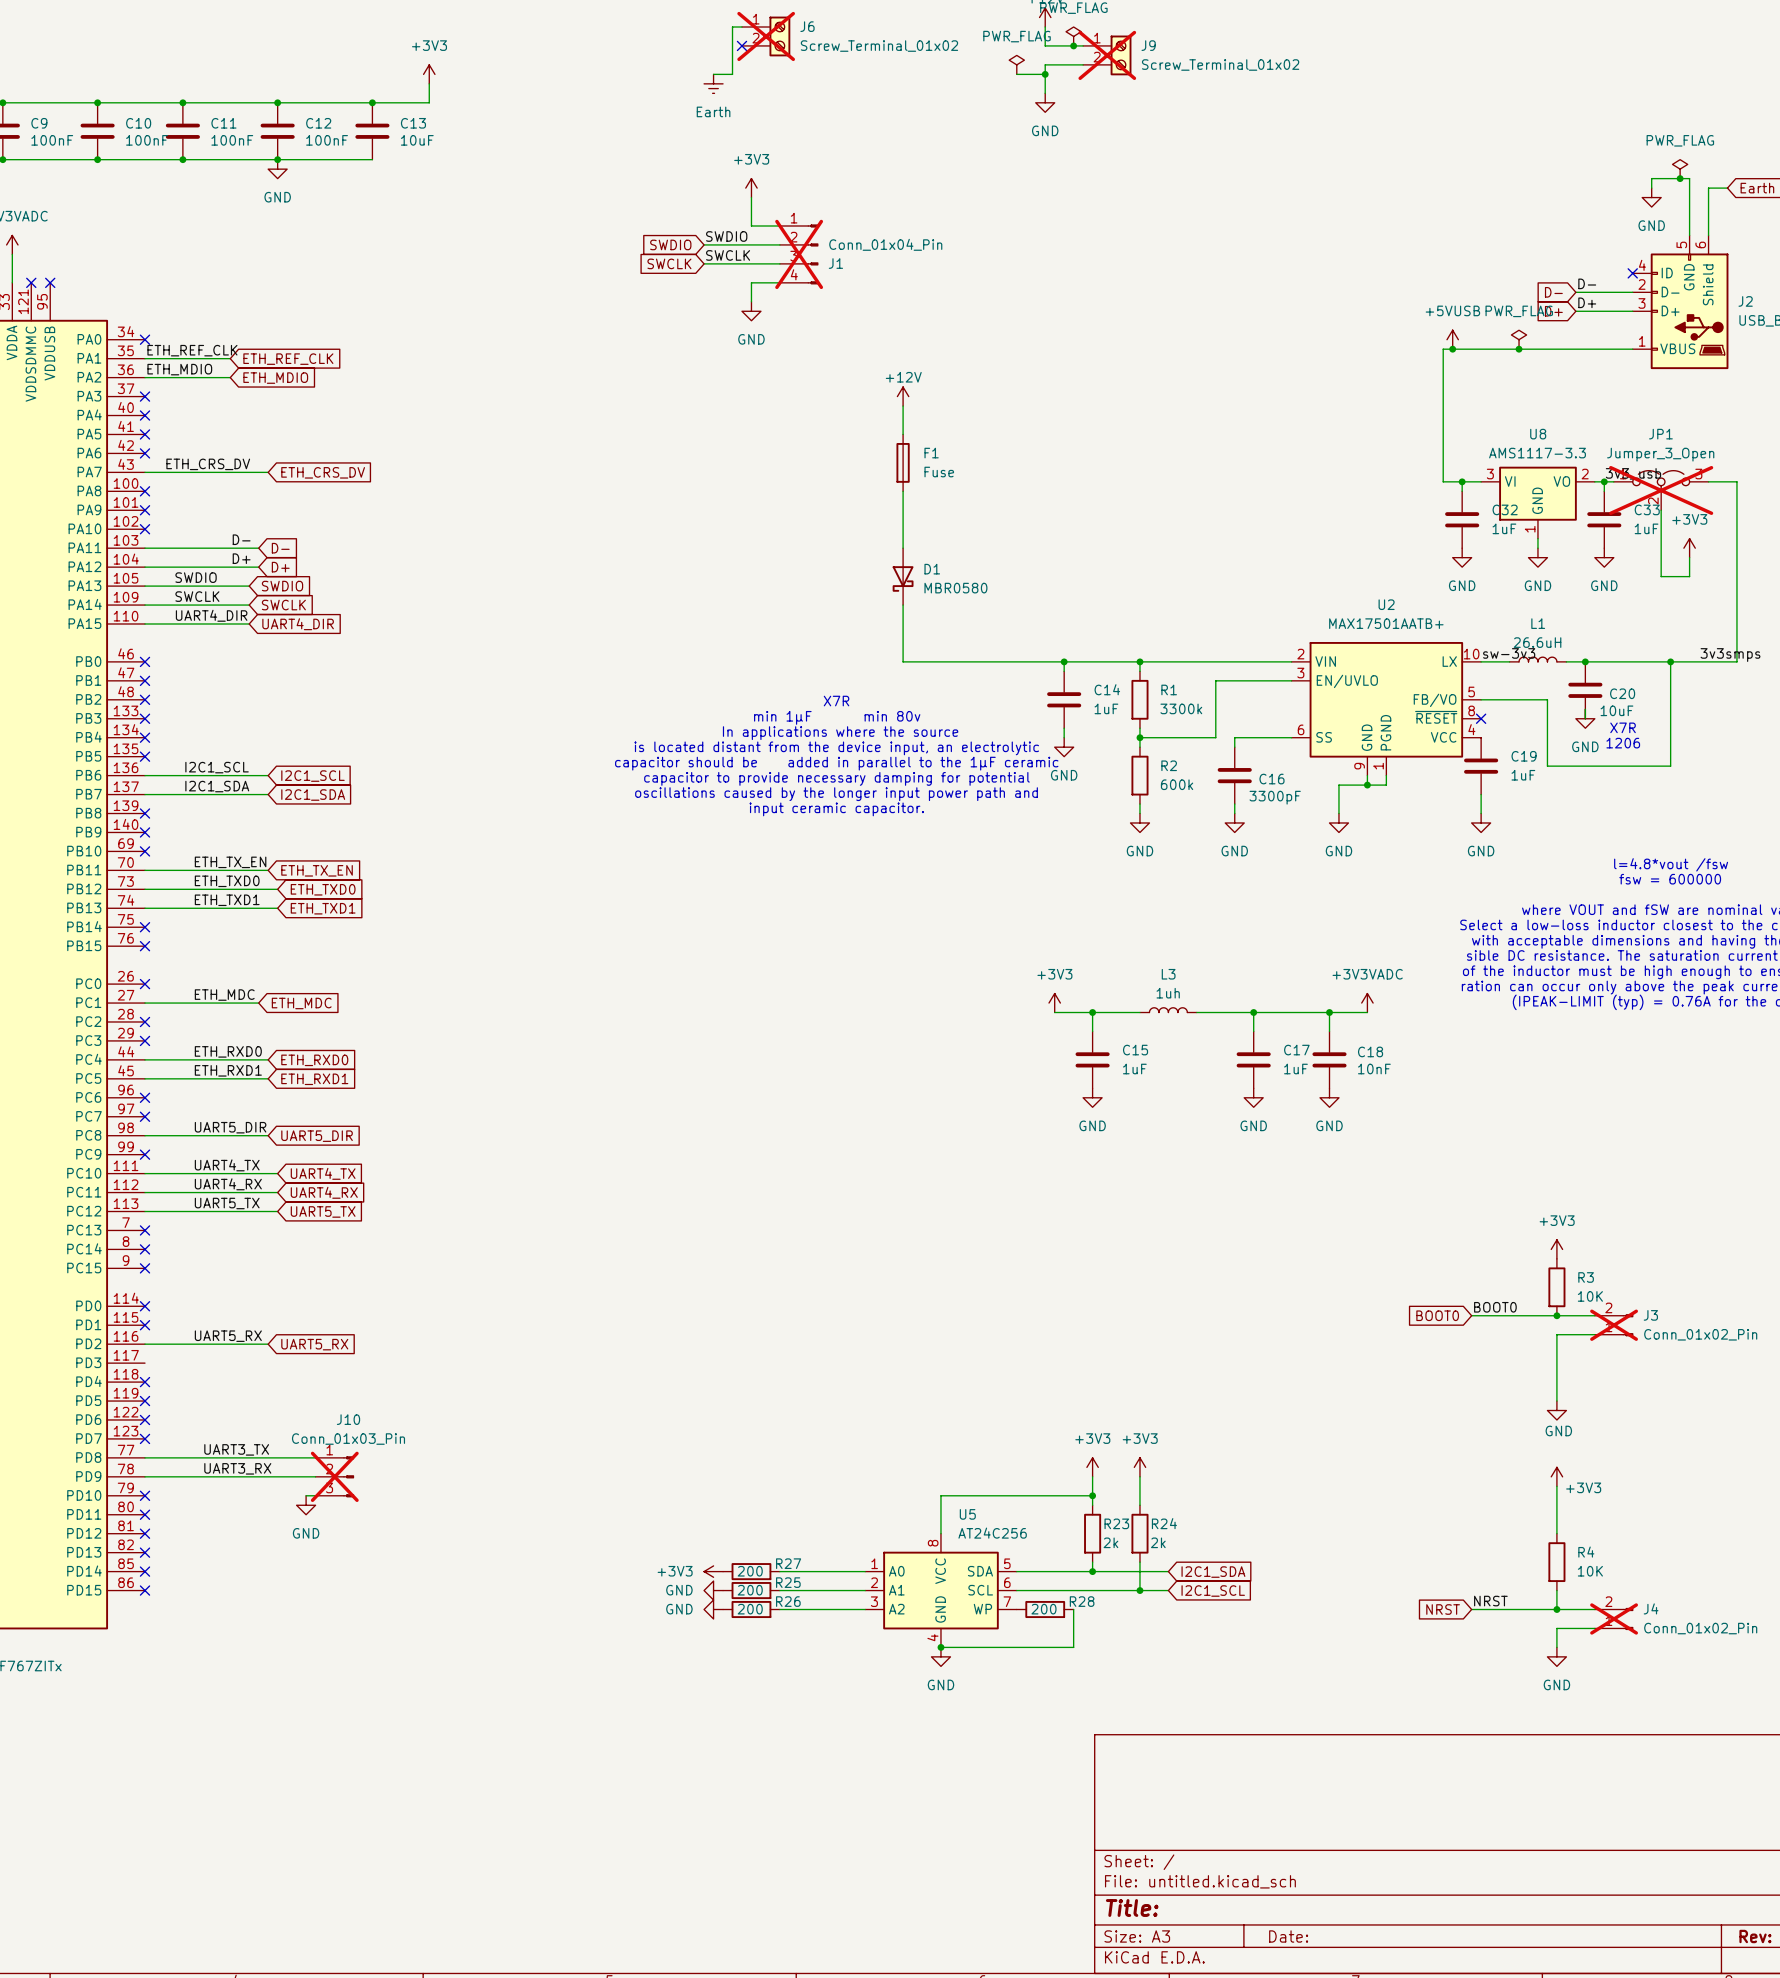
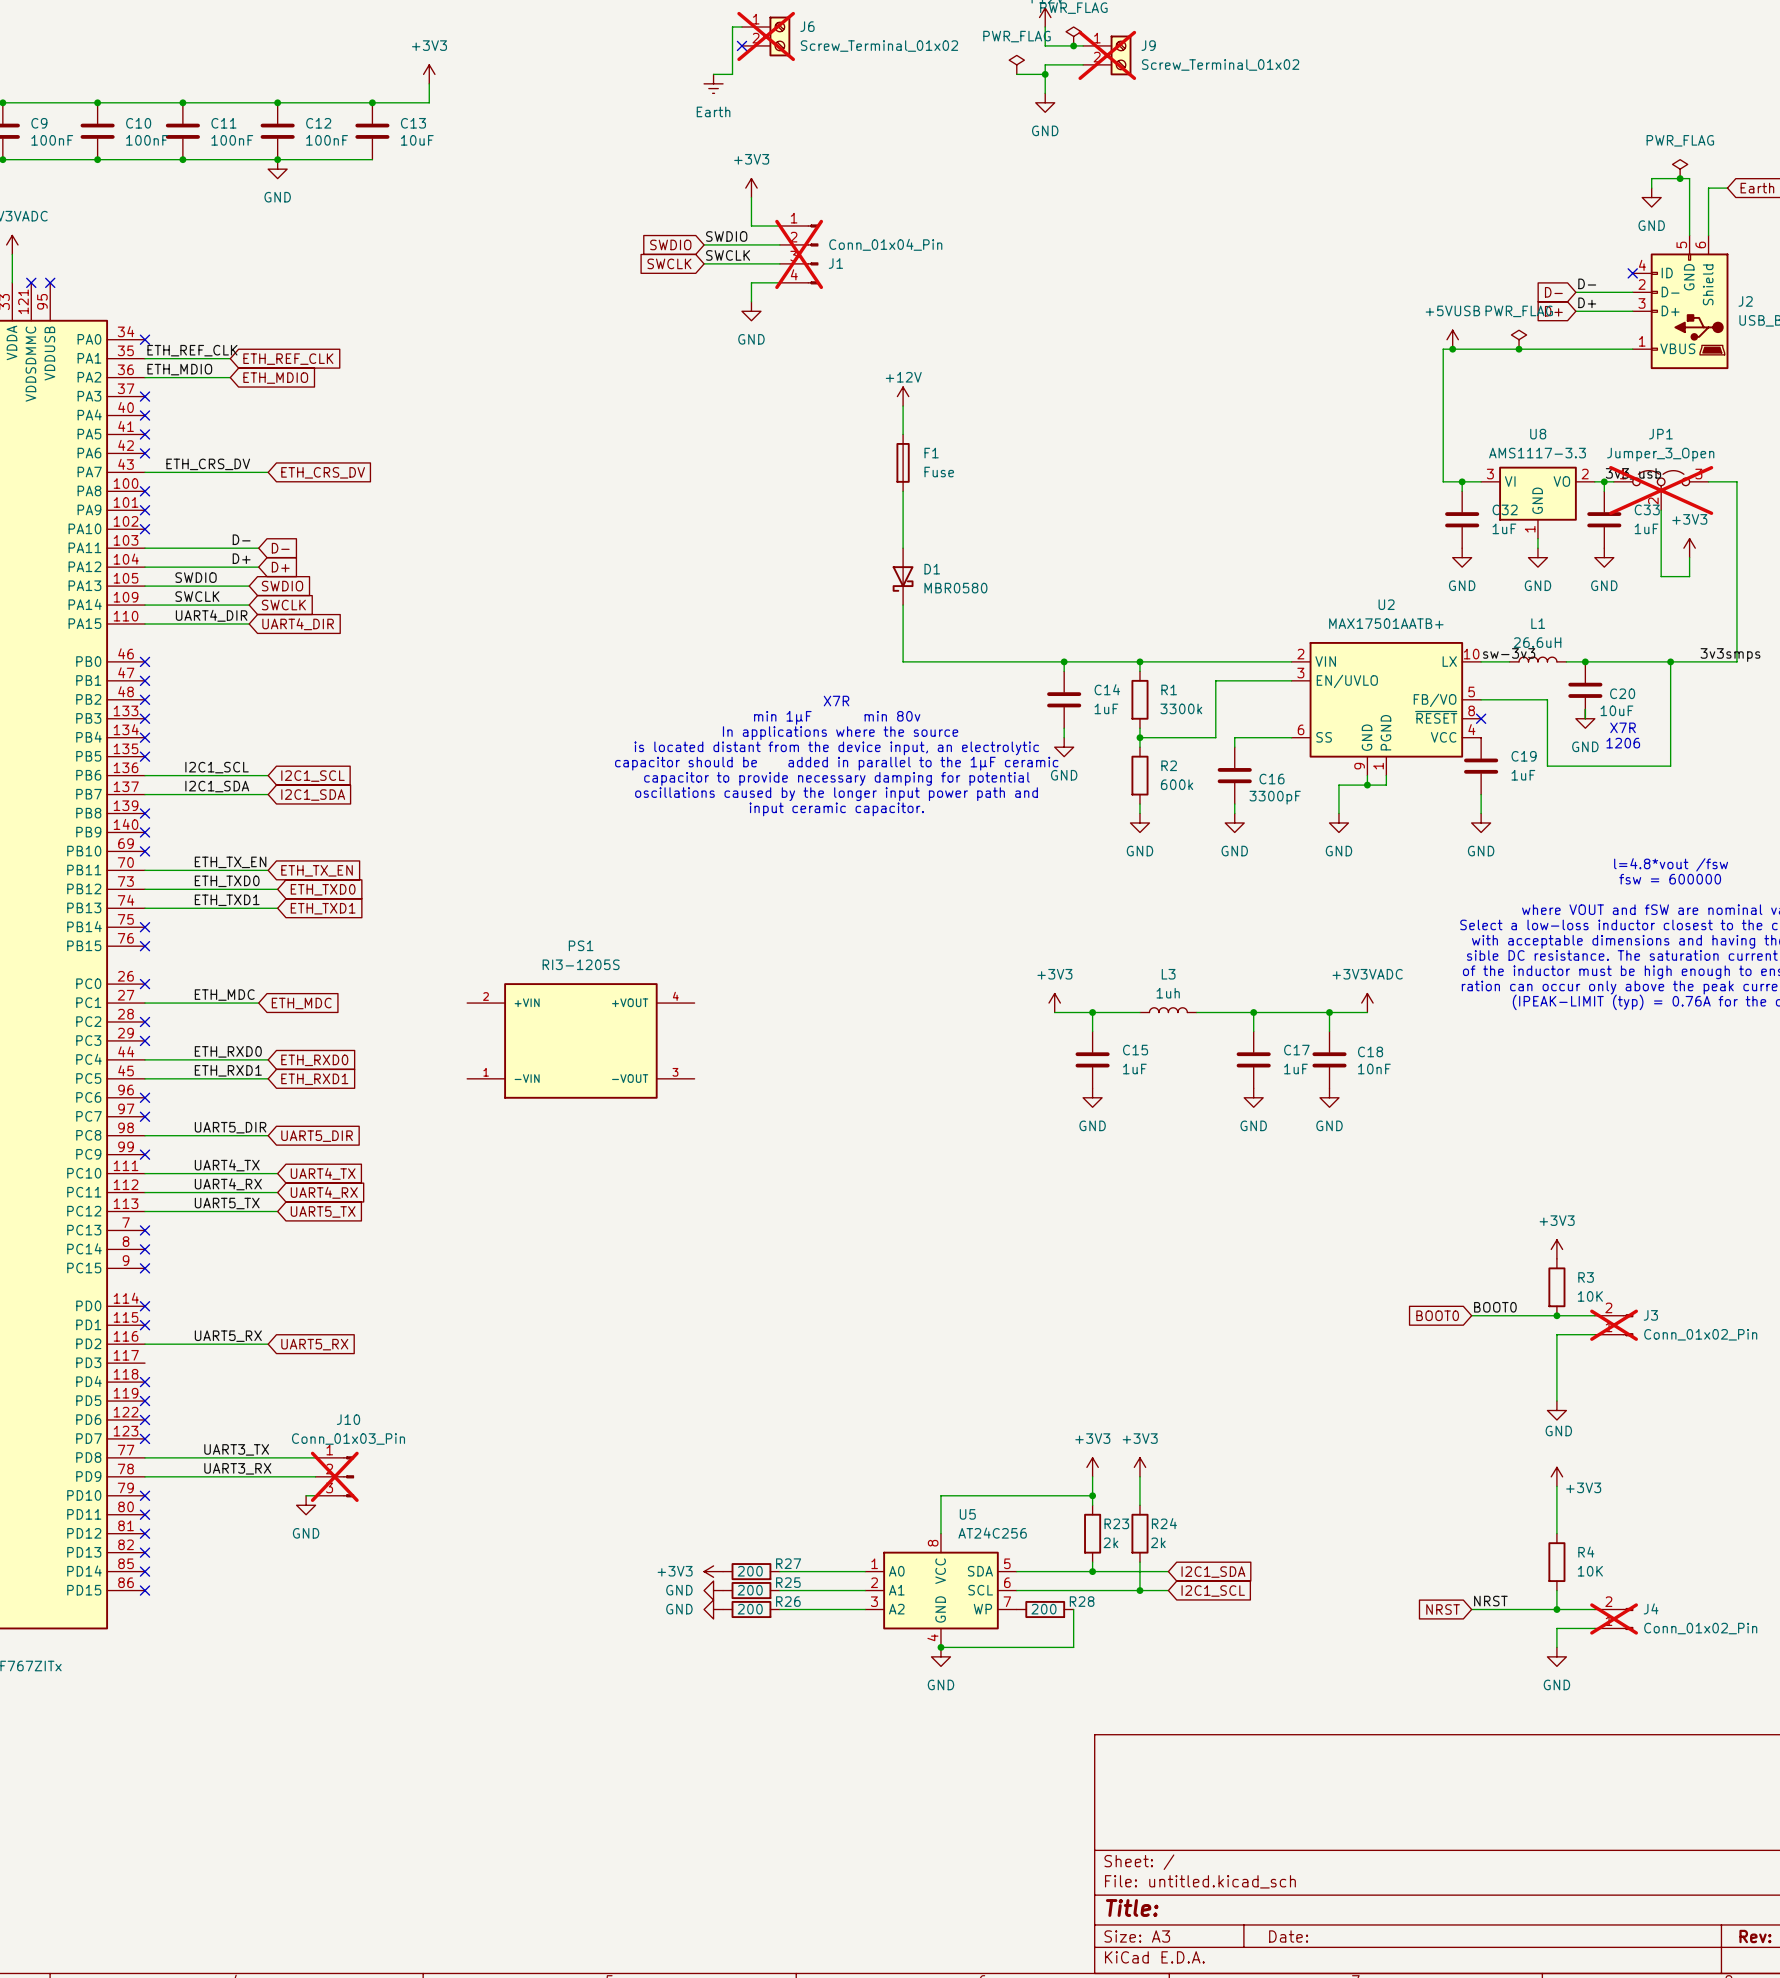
PS1: none -> RI3-1205S (580, 1040)

